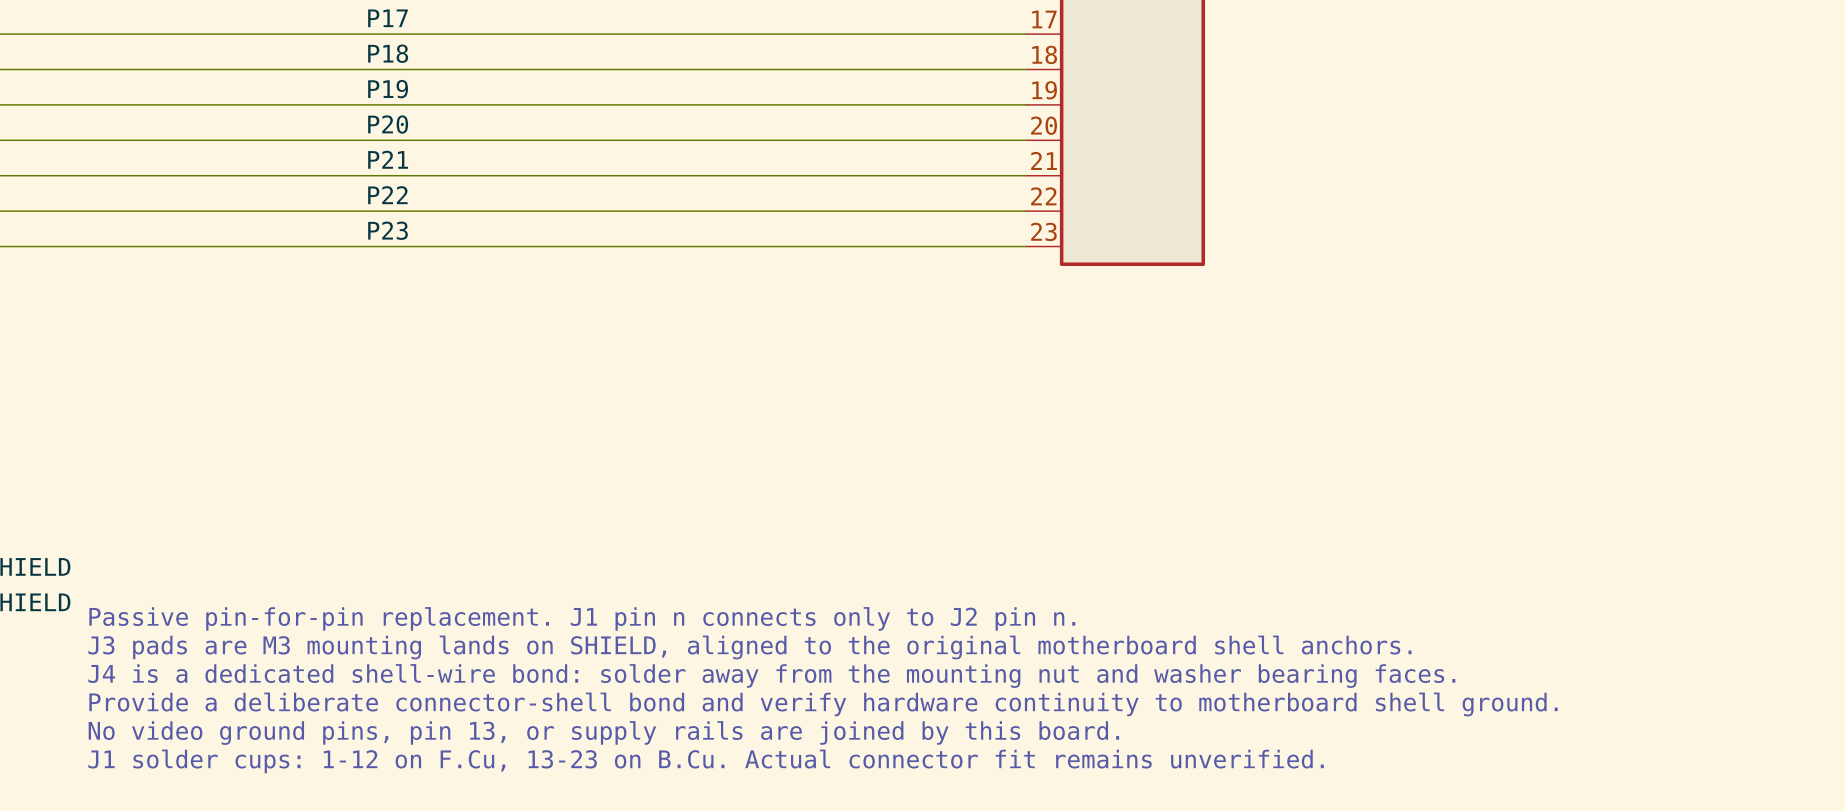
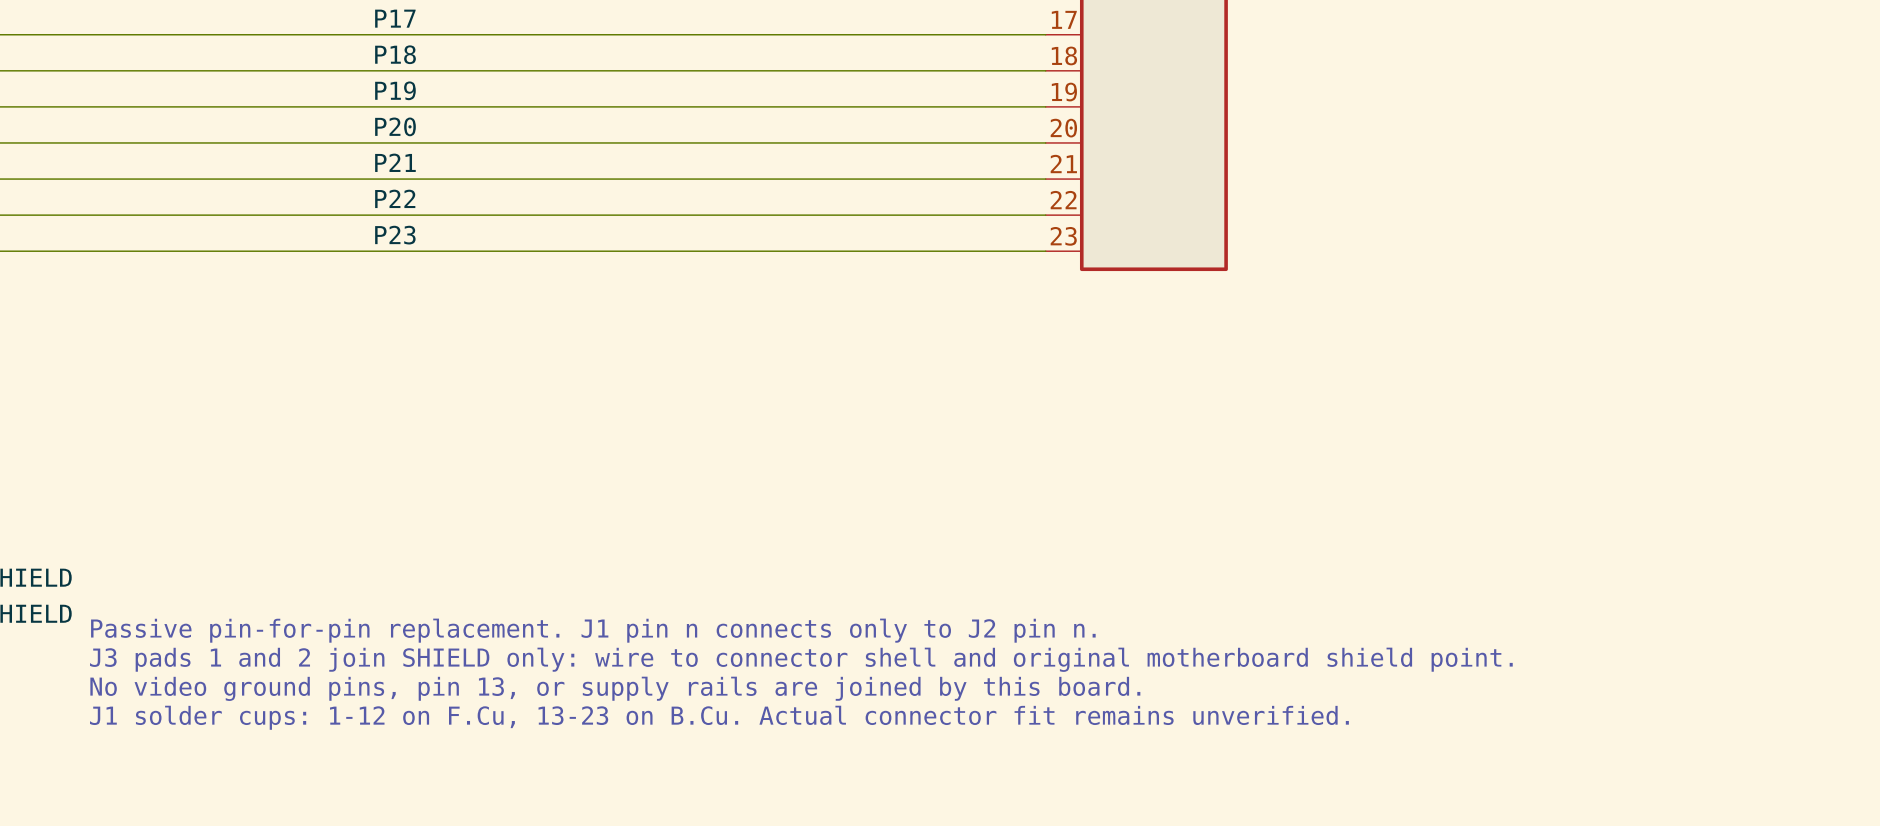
text: J3 pads are M3 mounting lands on SHIELD, aligned to the original motherboard shell anchors. (749, 647) -> J3 pads 1 and 2 join SHIELD only: wire to connector shell and original motherboard shield point. (801, 659)
text: J4 is a dedicated shell-wire bond: solder away from the mounting nut and washer bearing faces. (771, 675) -> No video ground pins, pin 13, or supply rails are joined by this board. (615, 688)
text: Provide a deliberate connector-shell bond and verify hardware continuity to motherboard shell ground. (823, 704) -> J1 solder cups: 1-12 on F.Cu, 13-23 on B.Cu. Actual connector fit remains unverified. (719, 717)
text: No video ground pins, pin 13, or supply rails are joined by this board. (603, 732) -> none
text: J1 solder cups: 1-12 on F.Cu, 13-23 on B.Cu. Actual connector fit remains unverified. (706, 761) -> none

